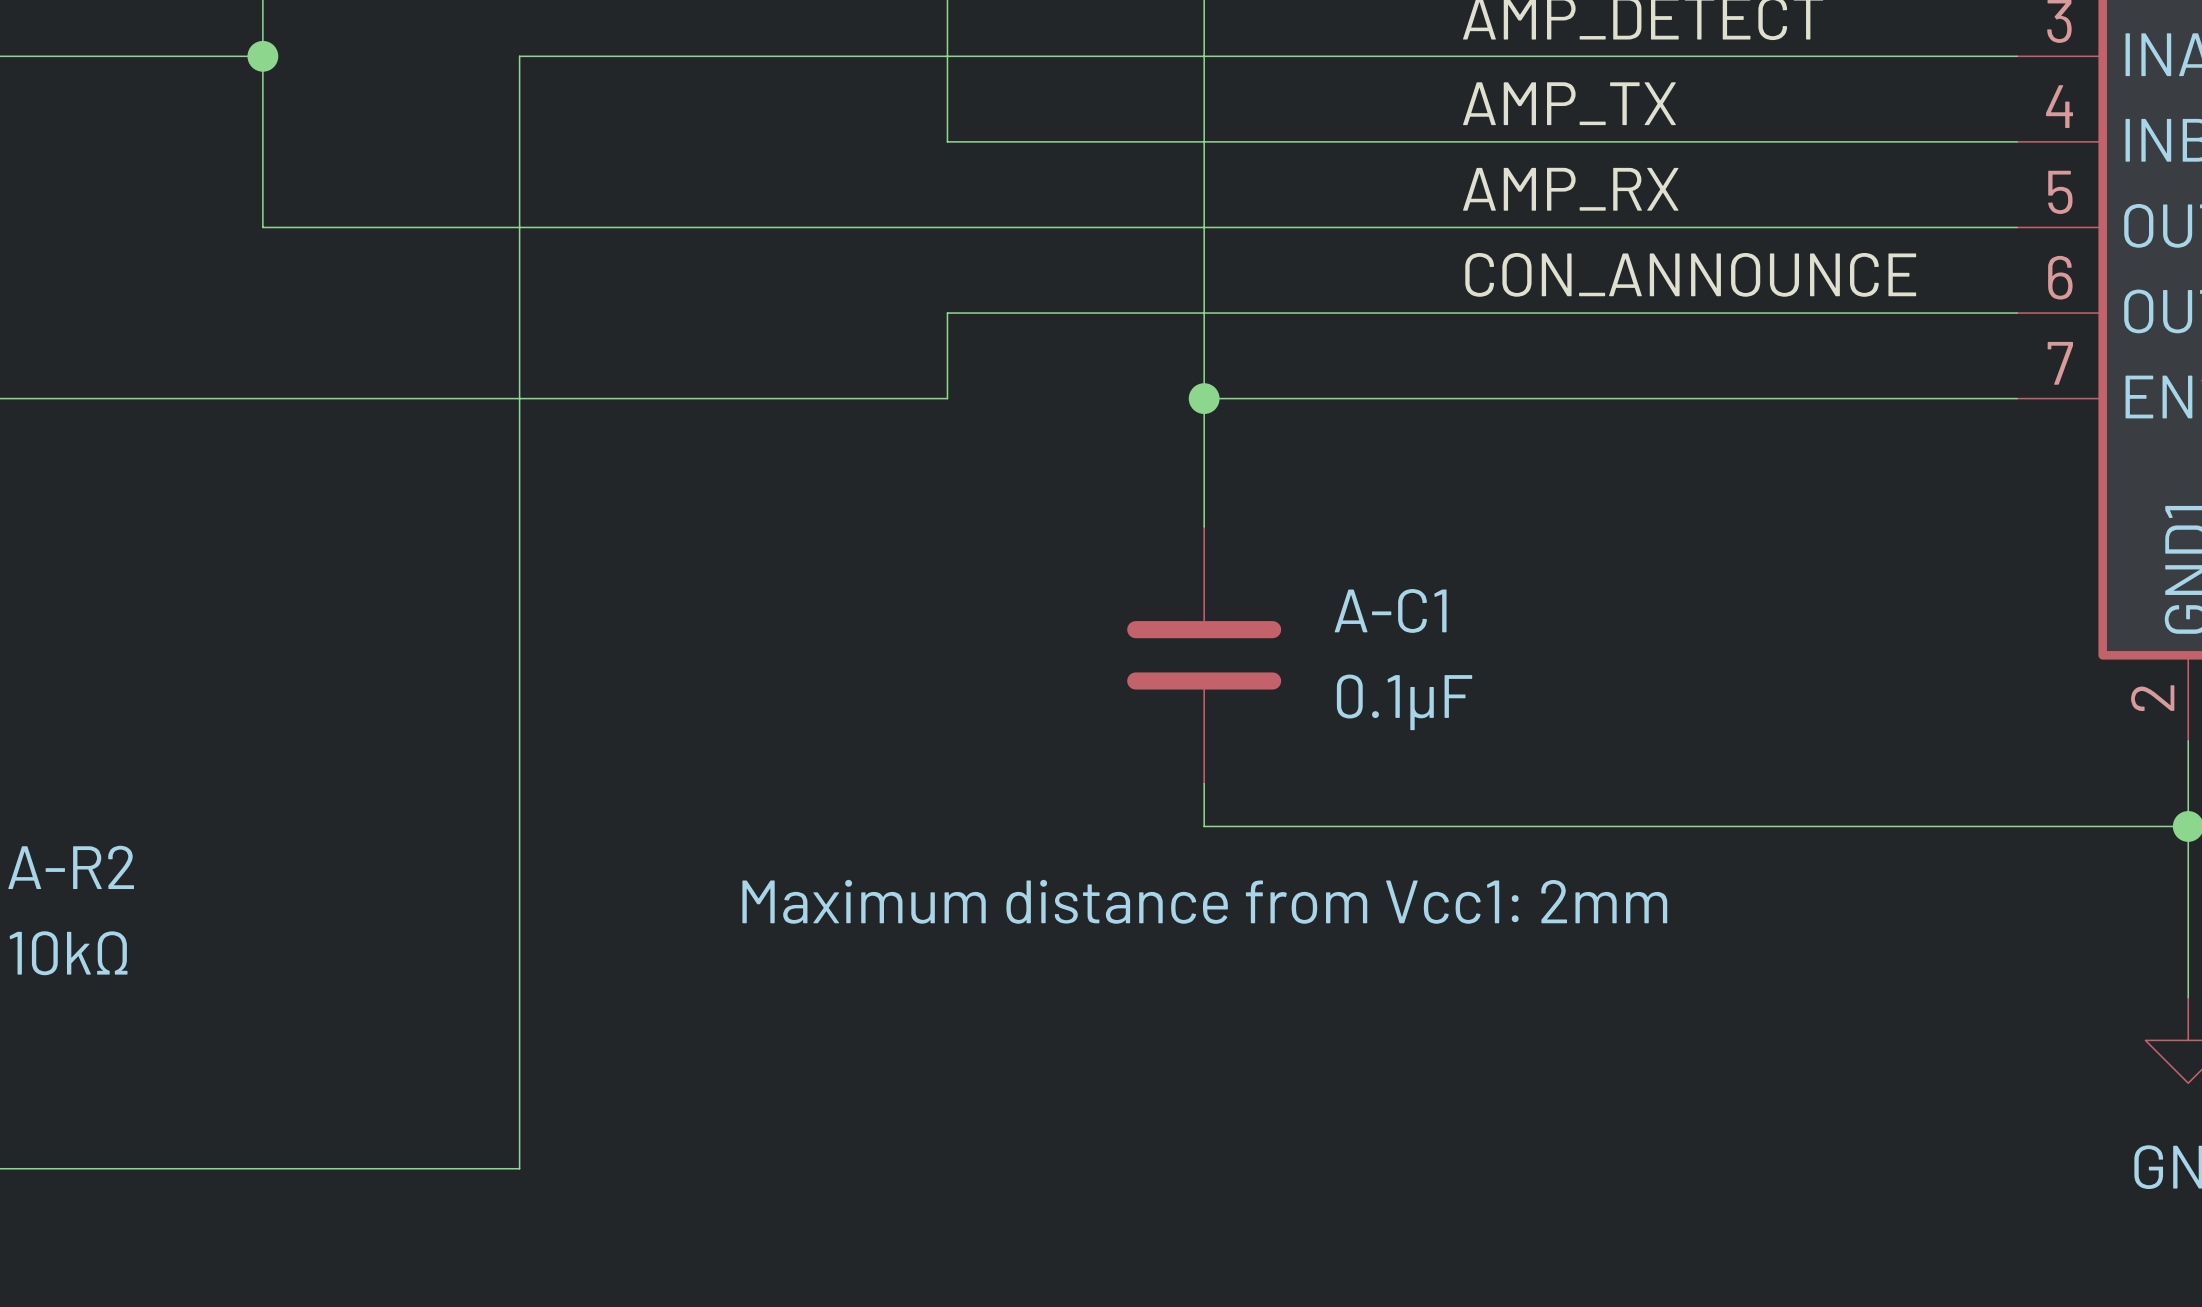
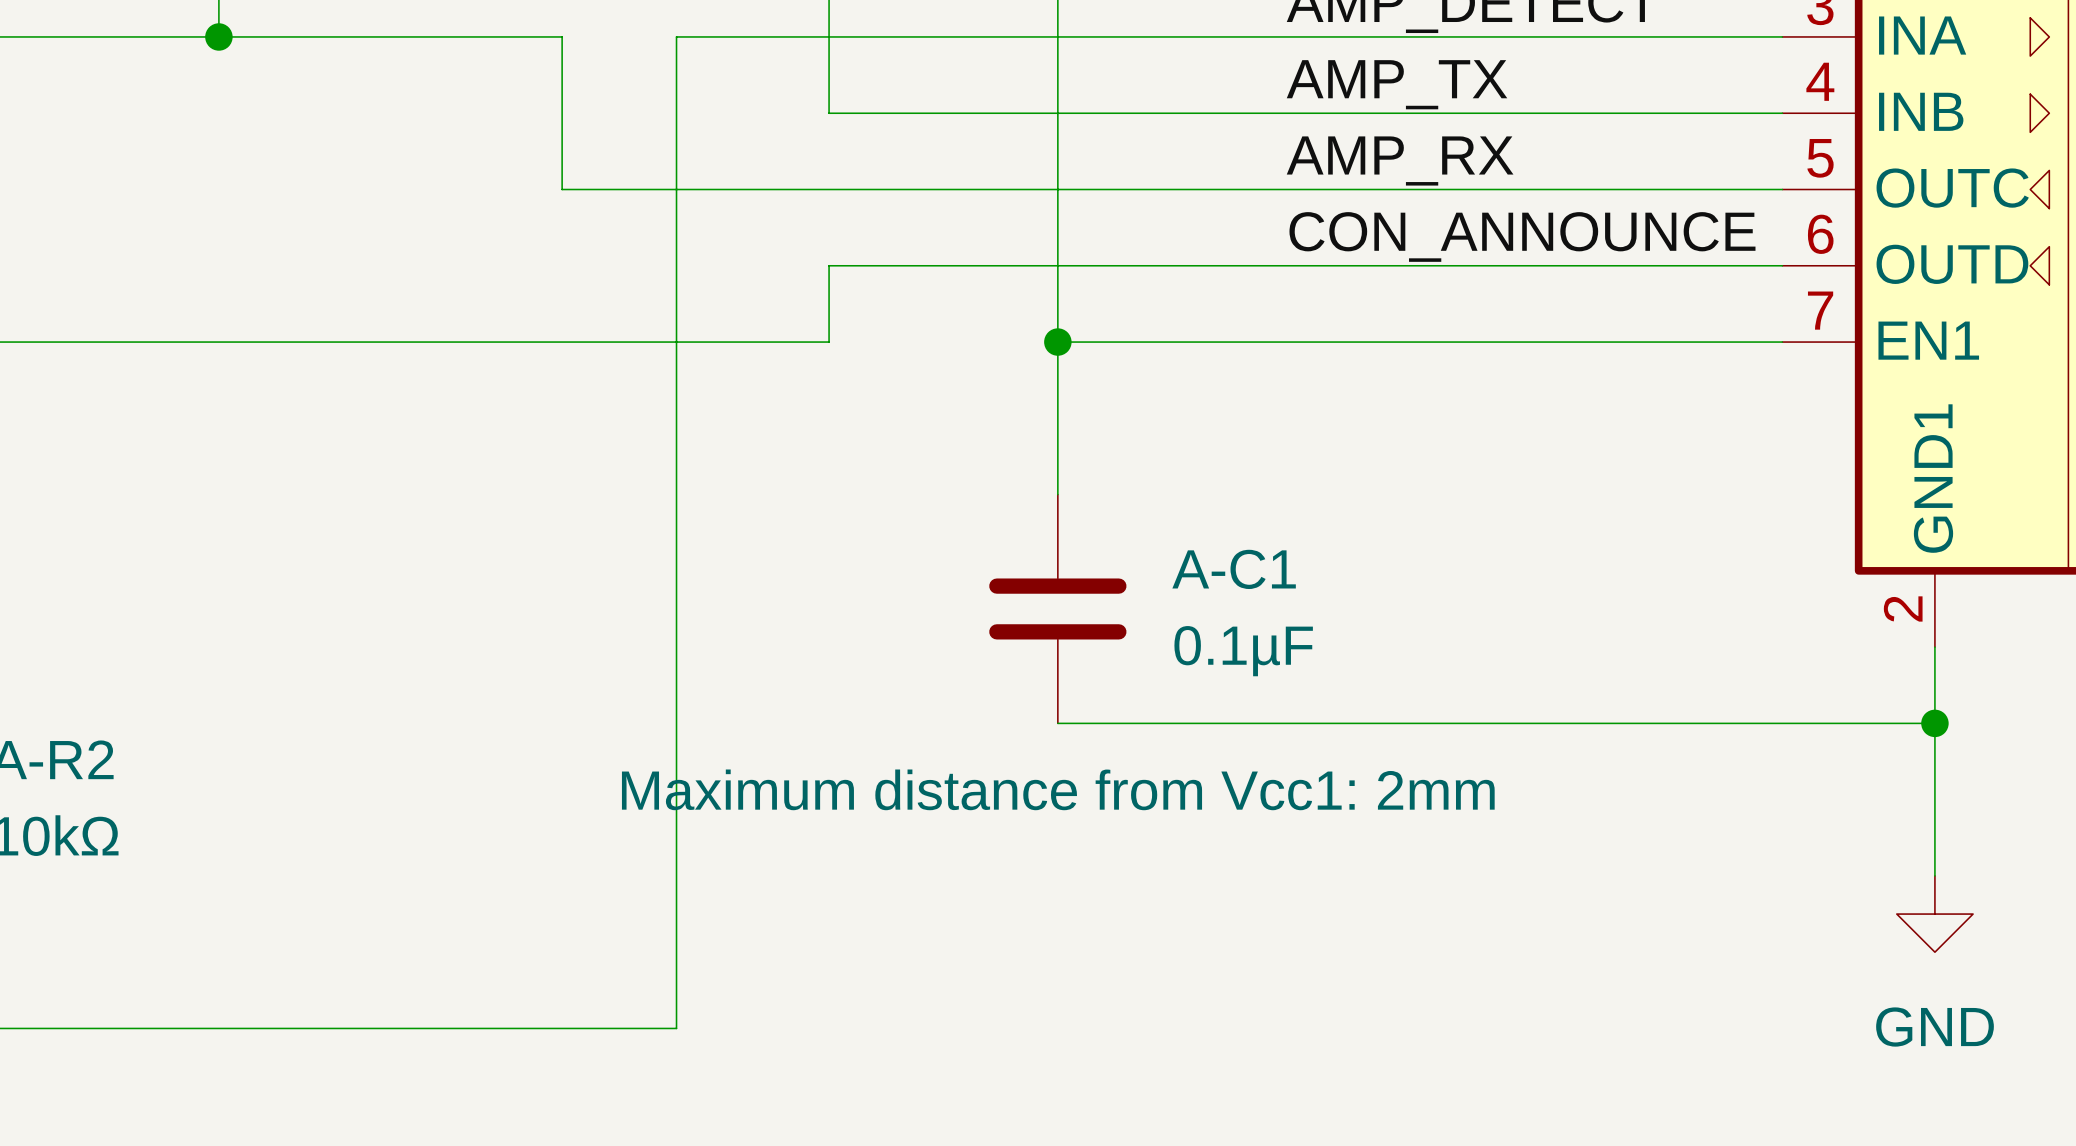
wire: (262, 56) (262, 227) (647, 227) -> (218, 36) (447, 36)
wire: (519, 56) (519, 1168) -> (676, 36) (676, 1028) (447, 1028)
wire: (647, 56) (776, 56) -> (562, 36) (562, 189)
A-C1 position: (1204, 655) -> (1057, 608)

